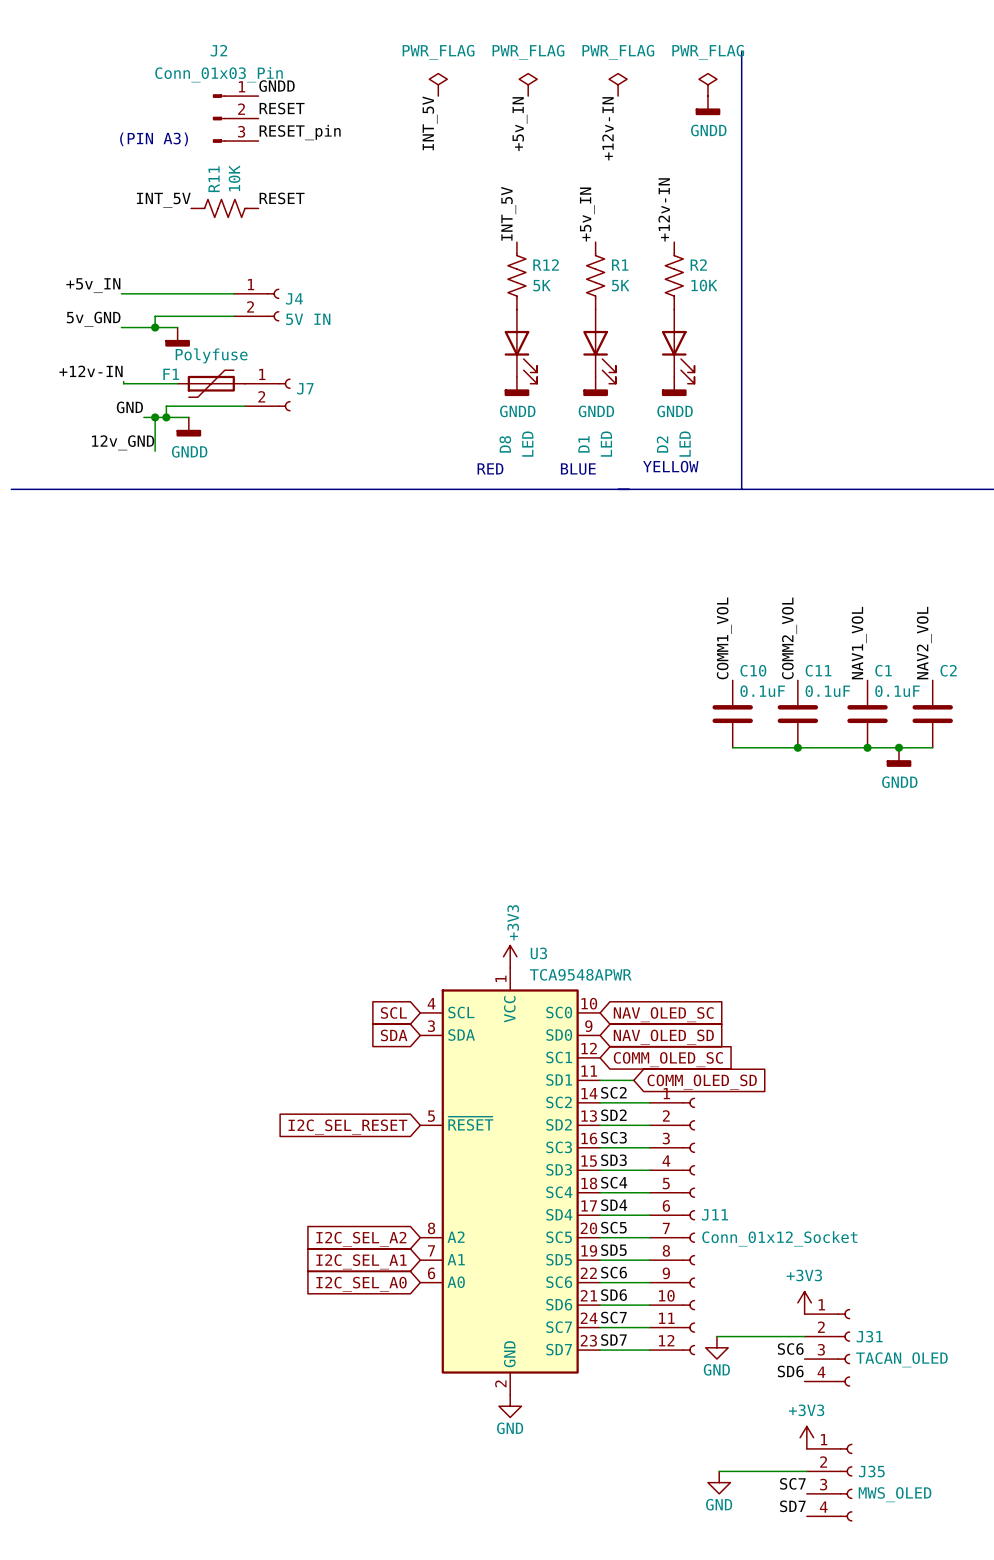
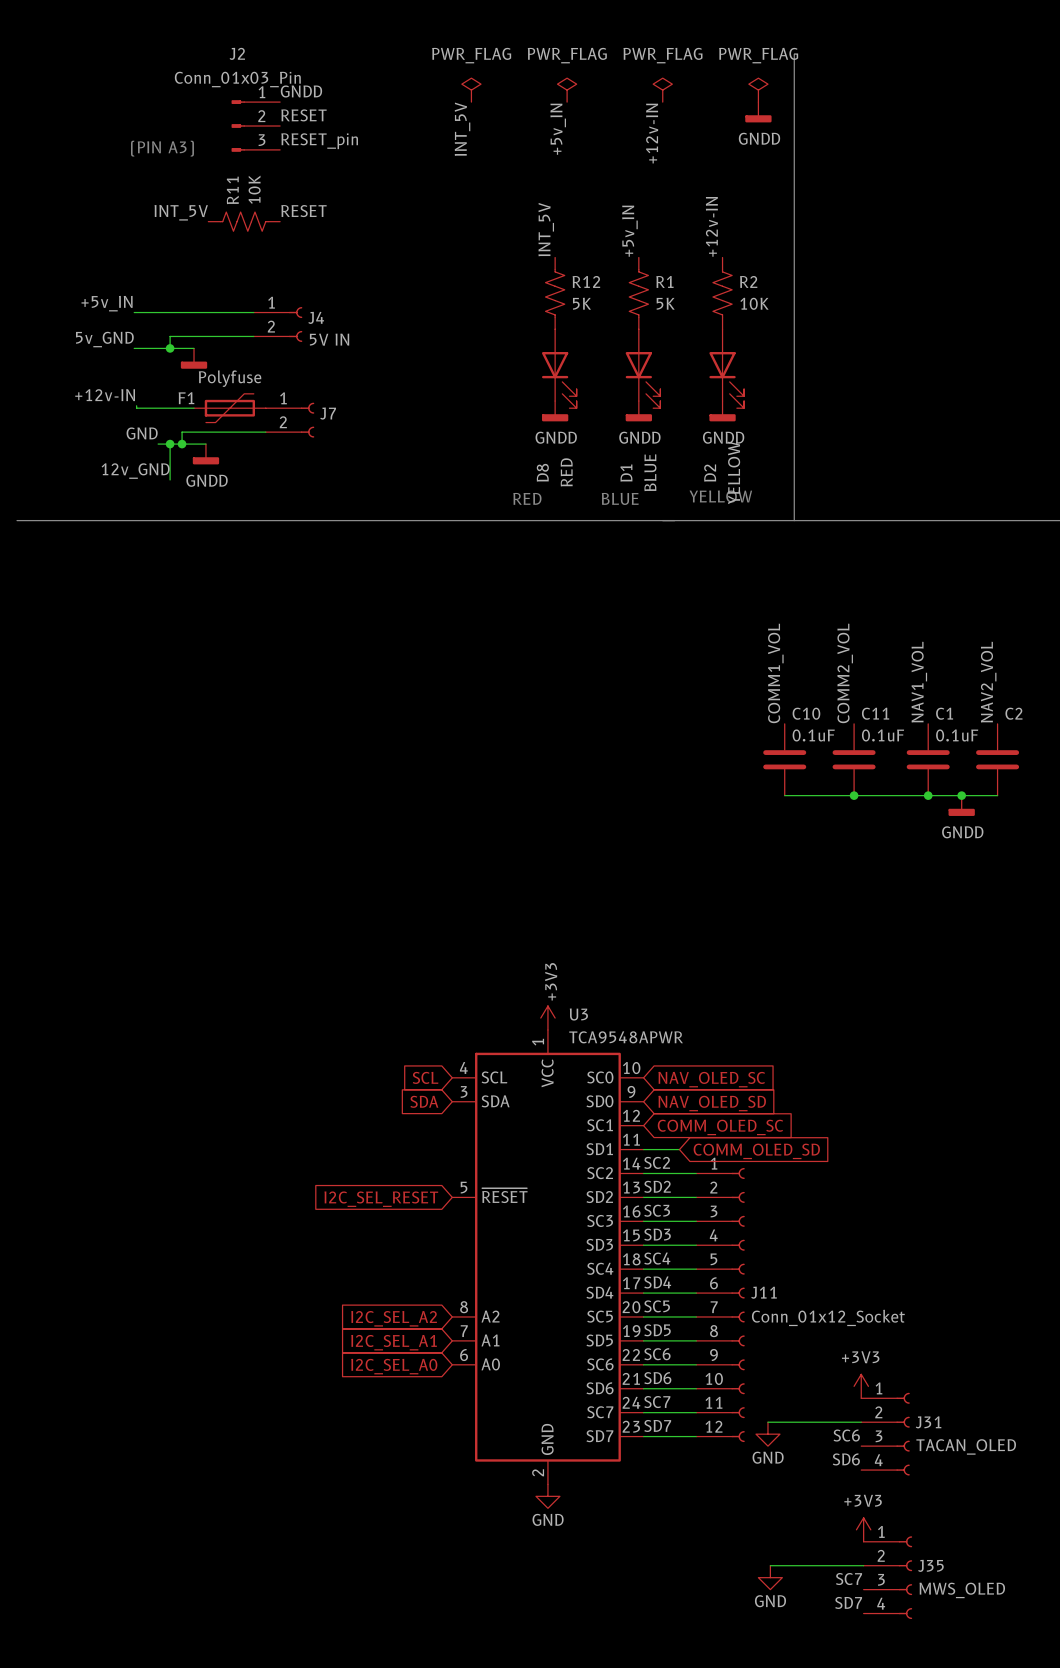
D8 value: LED (527, 444) -> RED (566, 472)
D1 value: LED (606, 444) -> BLUE (650, 472)
D2 value: LED (685, 444) -> YELLOW (734, 472)

